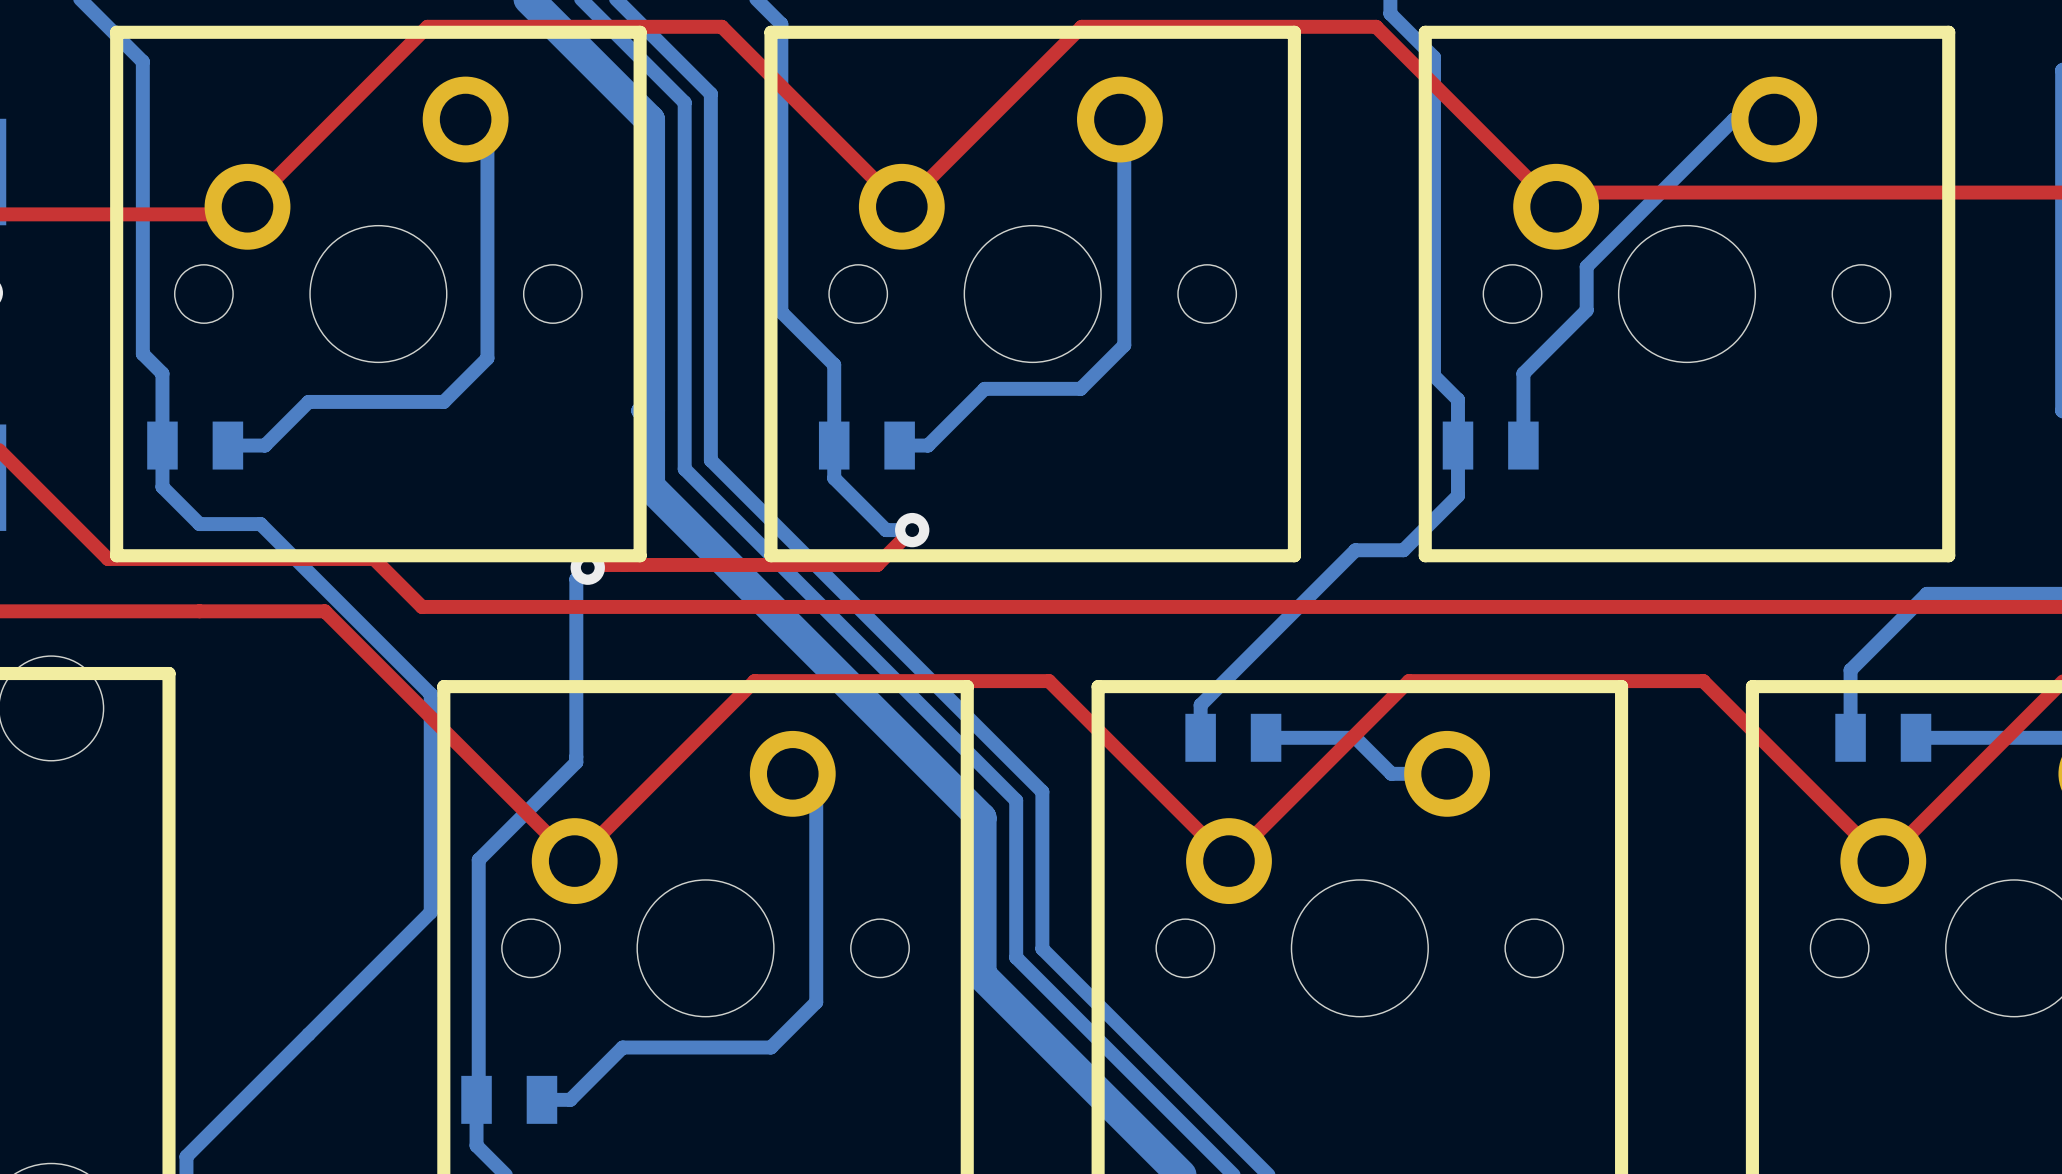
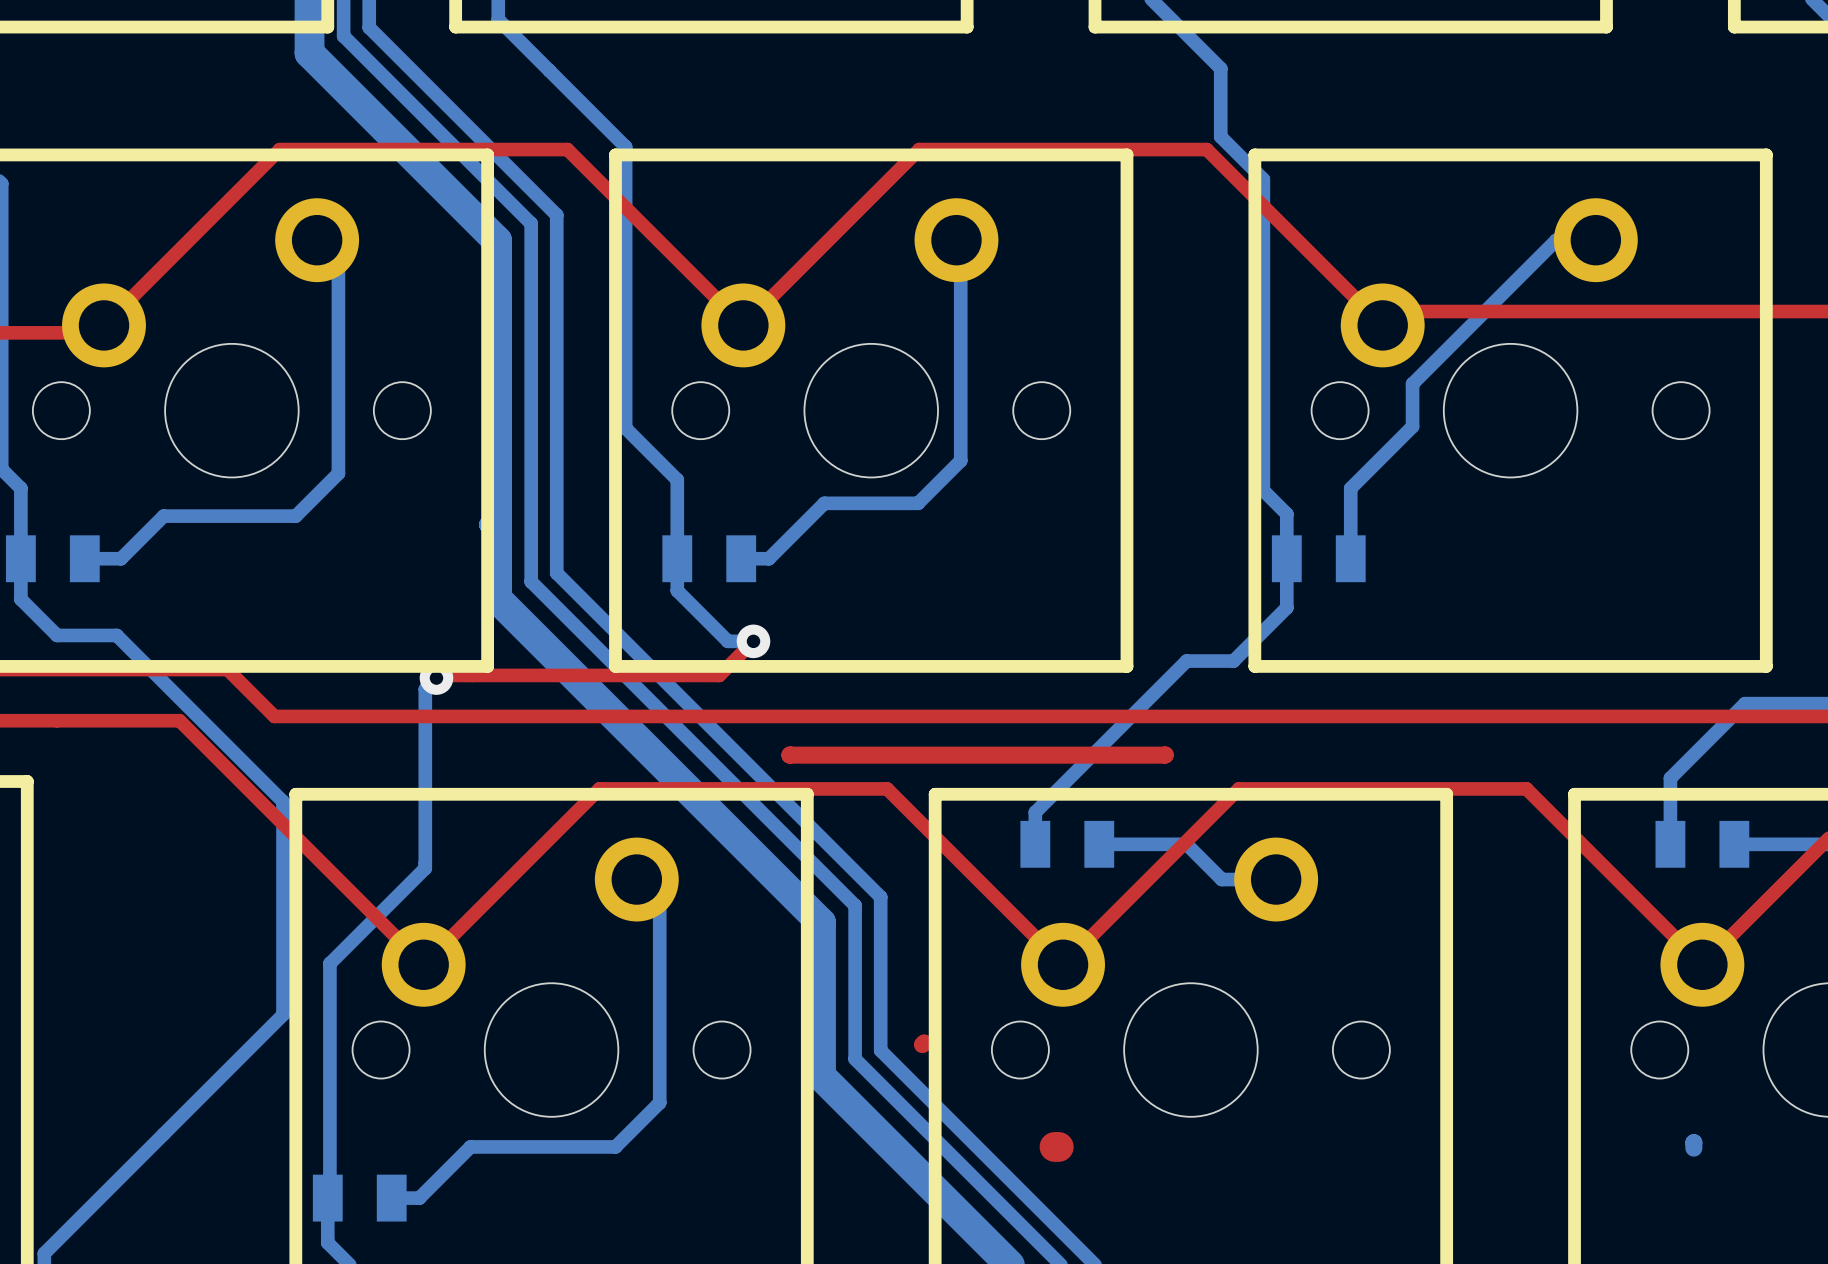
top track: none -> (789, 755) (1164, 755)
top track: none -> (924, 1042) (922, 1044)
bottom track: none -> (1693, 1142) (1693, 1148)
top track: none -> (1054, 1146) (1058, 1146)

